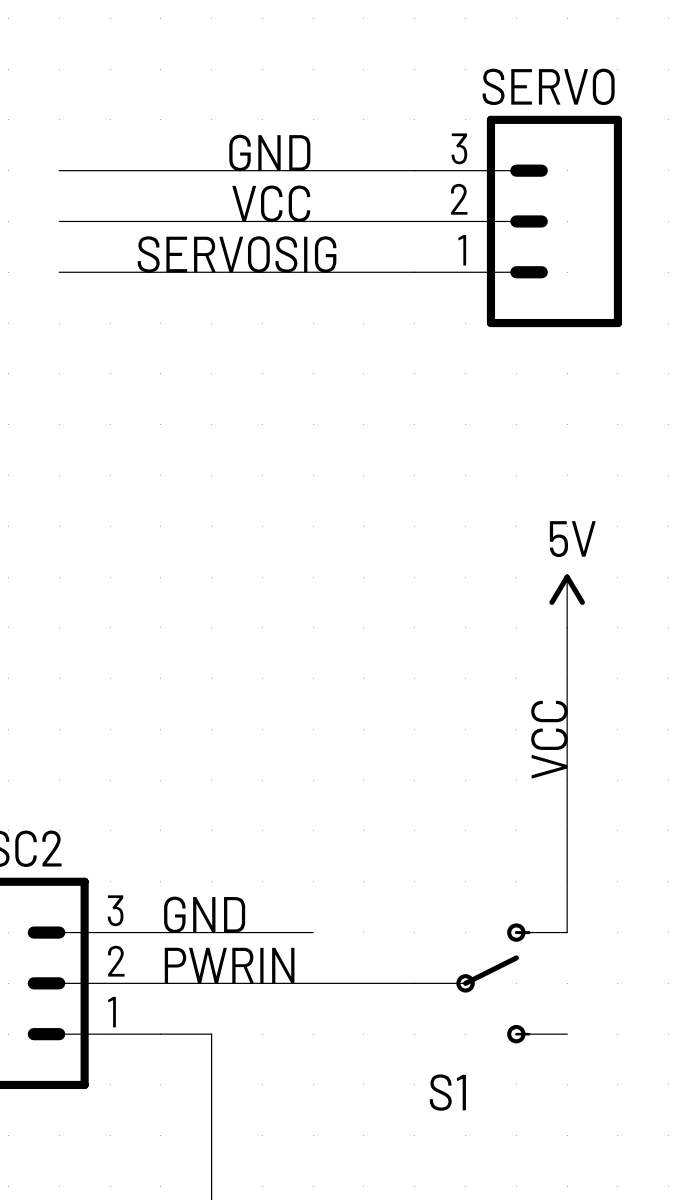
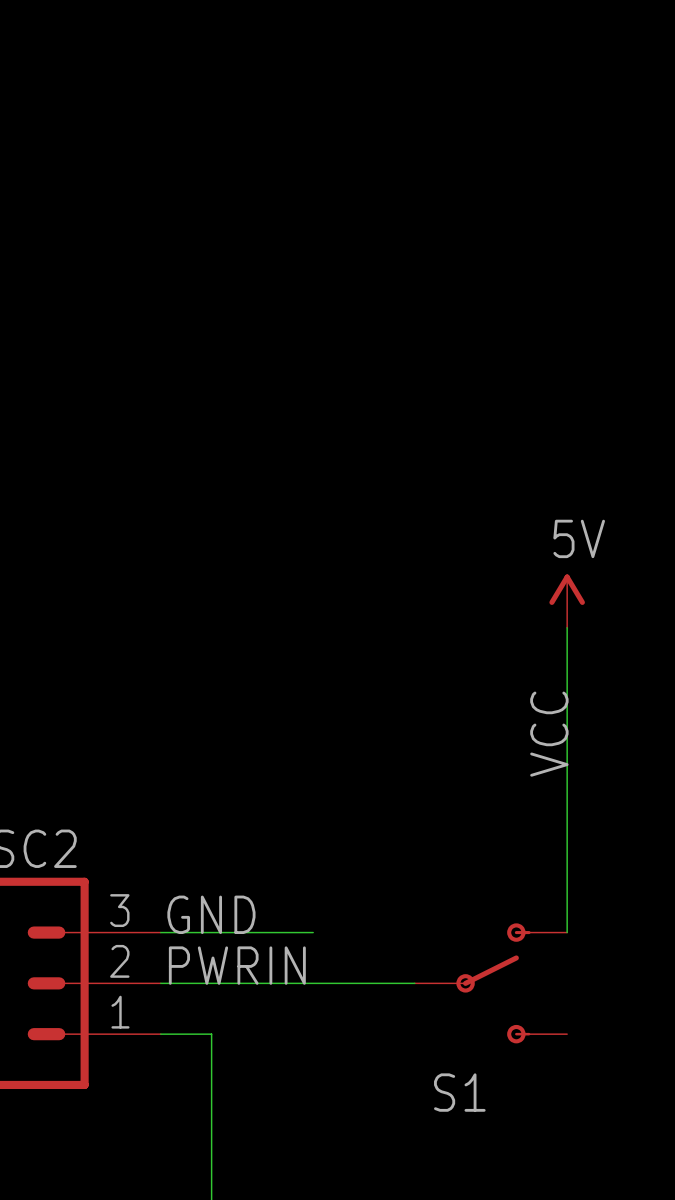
label: GND (269, 152) -> none
wire: (59, 170) (414, 170) -> none
label: VCC (271, 203) -> none
wire: (59, 221) (414, 221) -> none
SERVO: (518, 221) -> none
label: SERVOSIG (237, 254) -> none
wire: (59, 272) (414, 272) -> none

